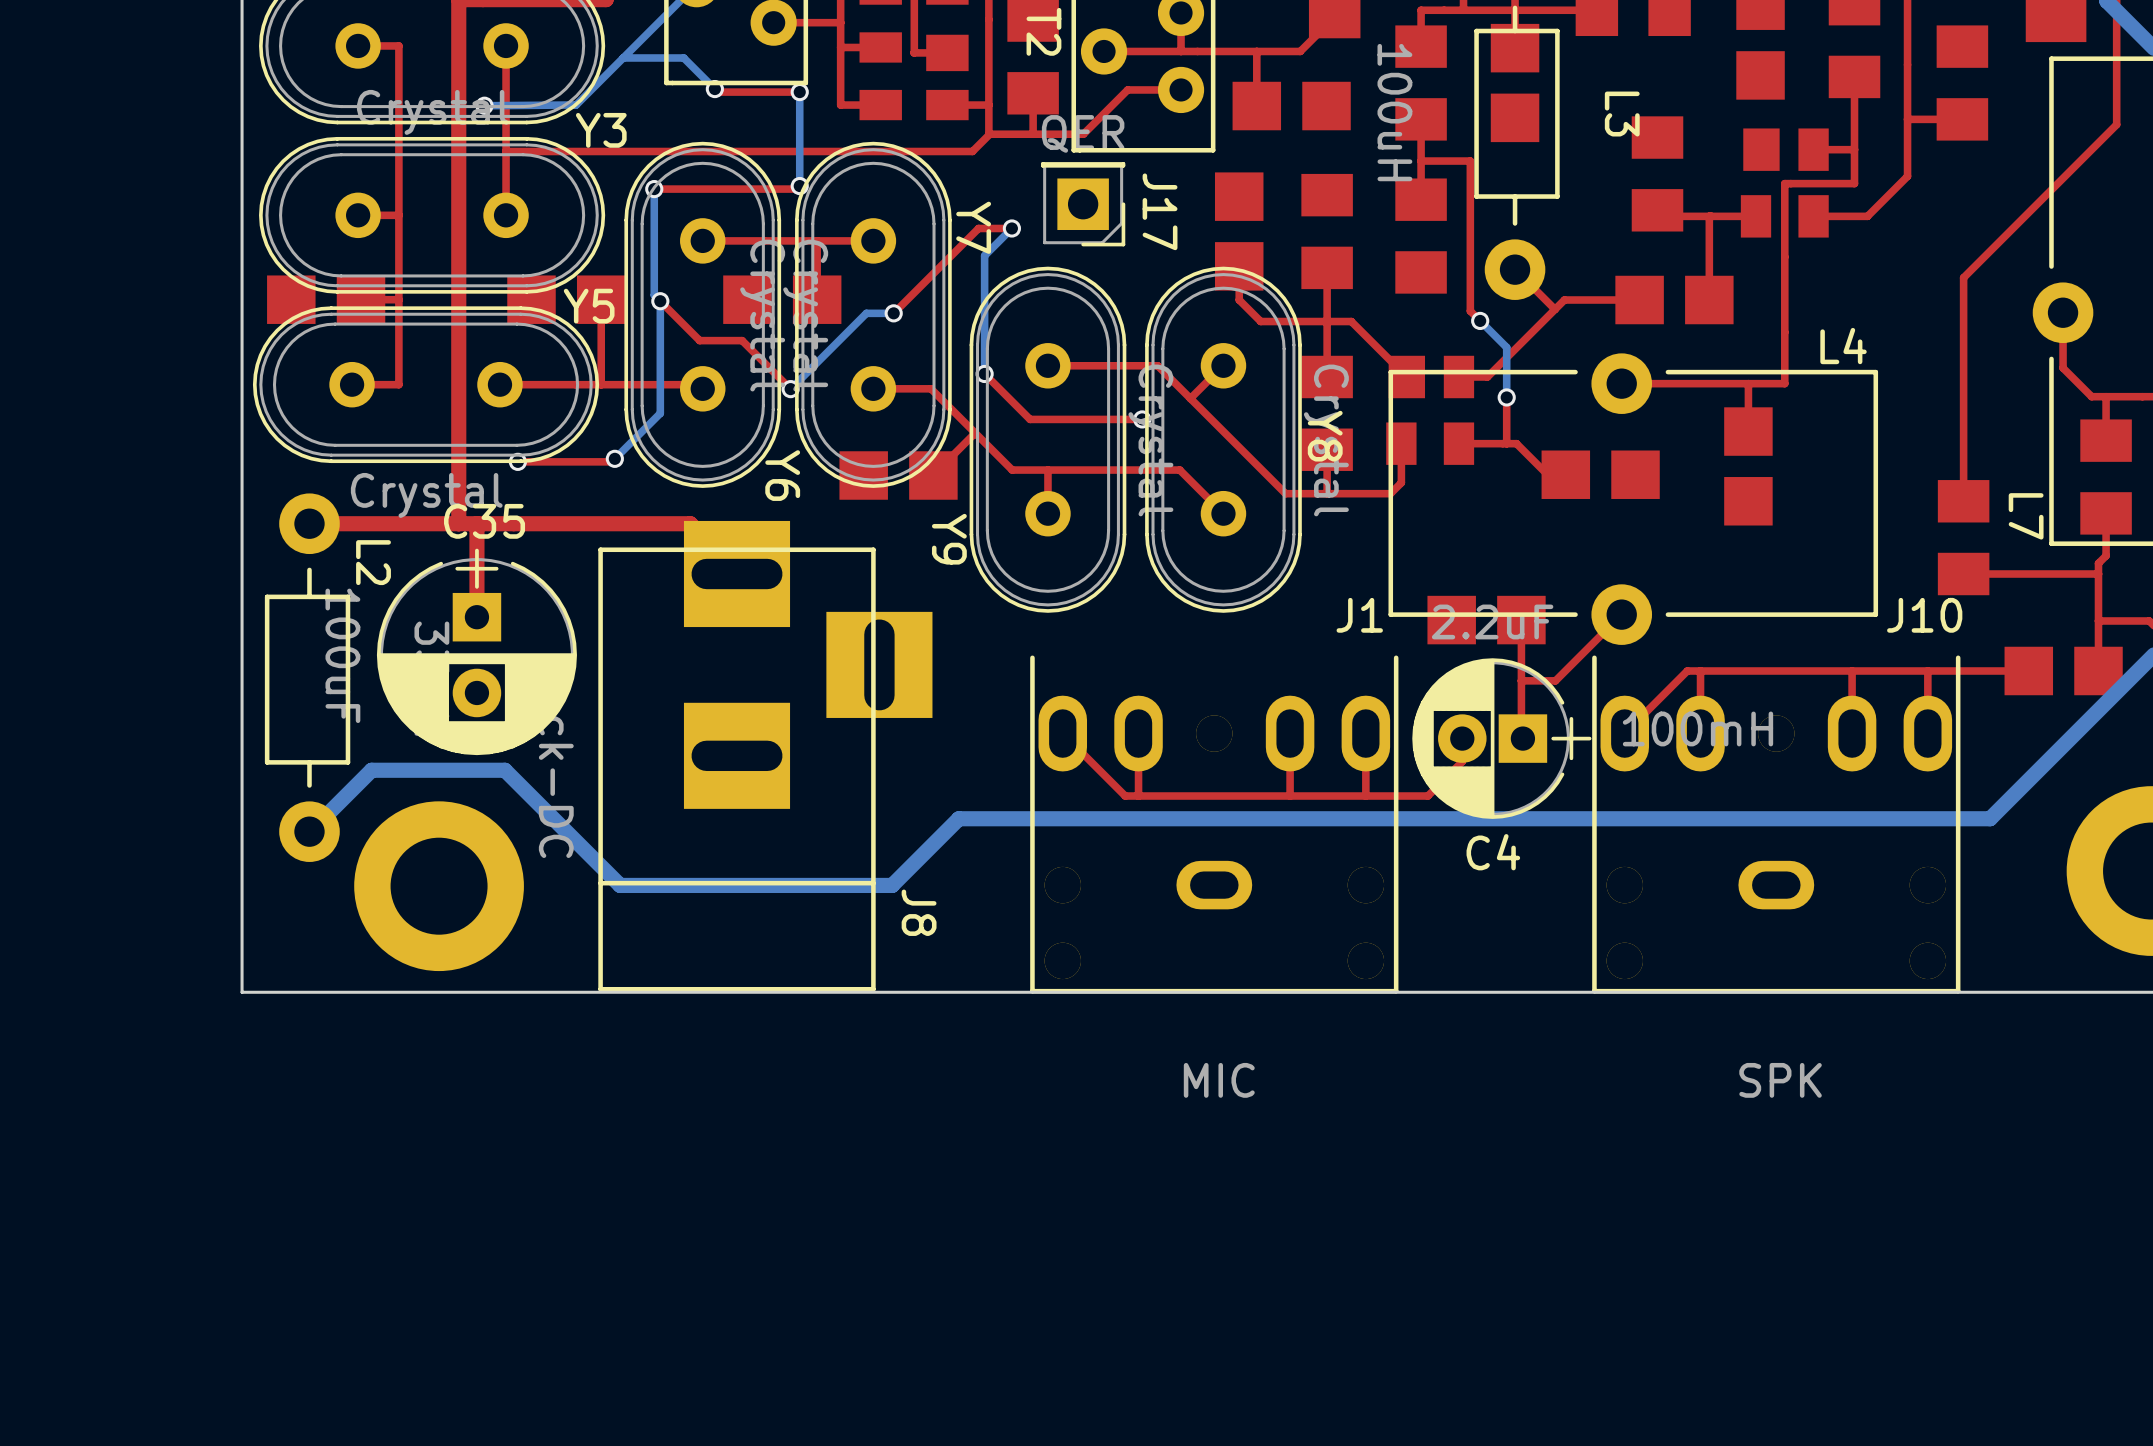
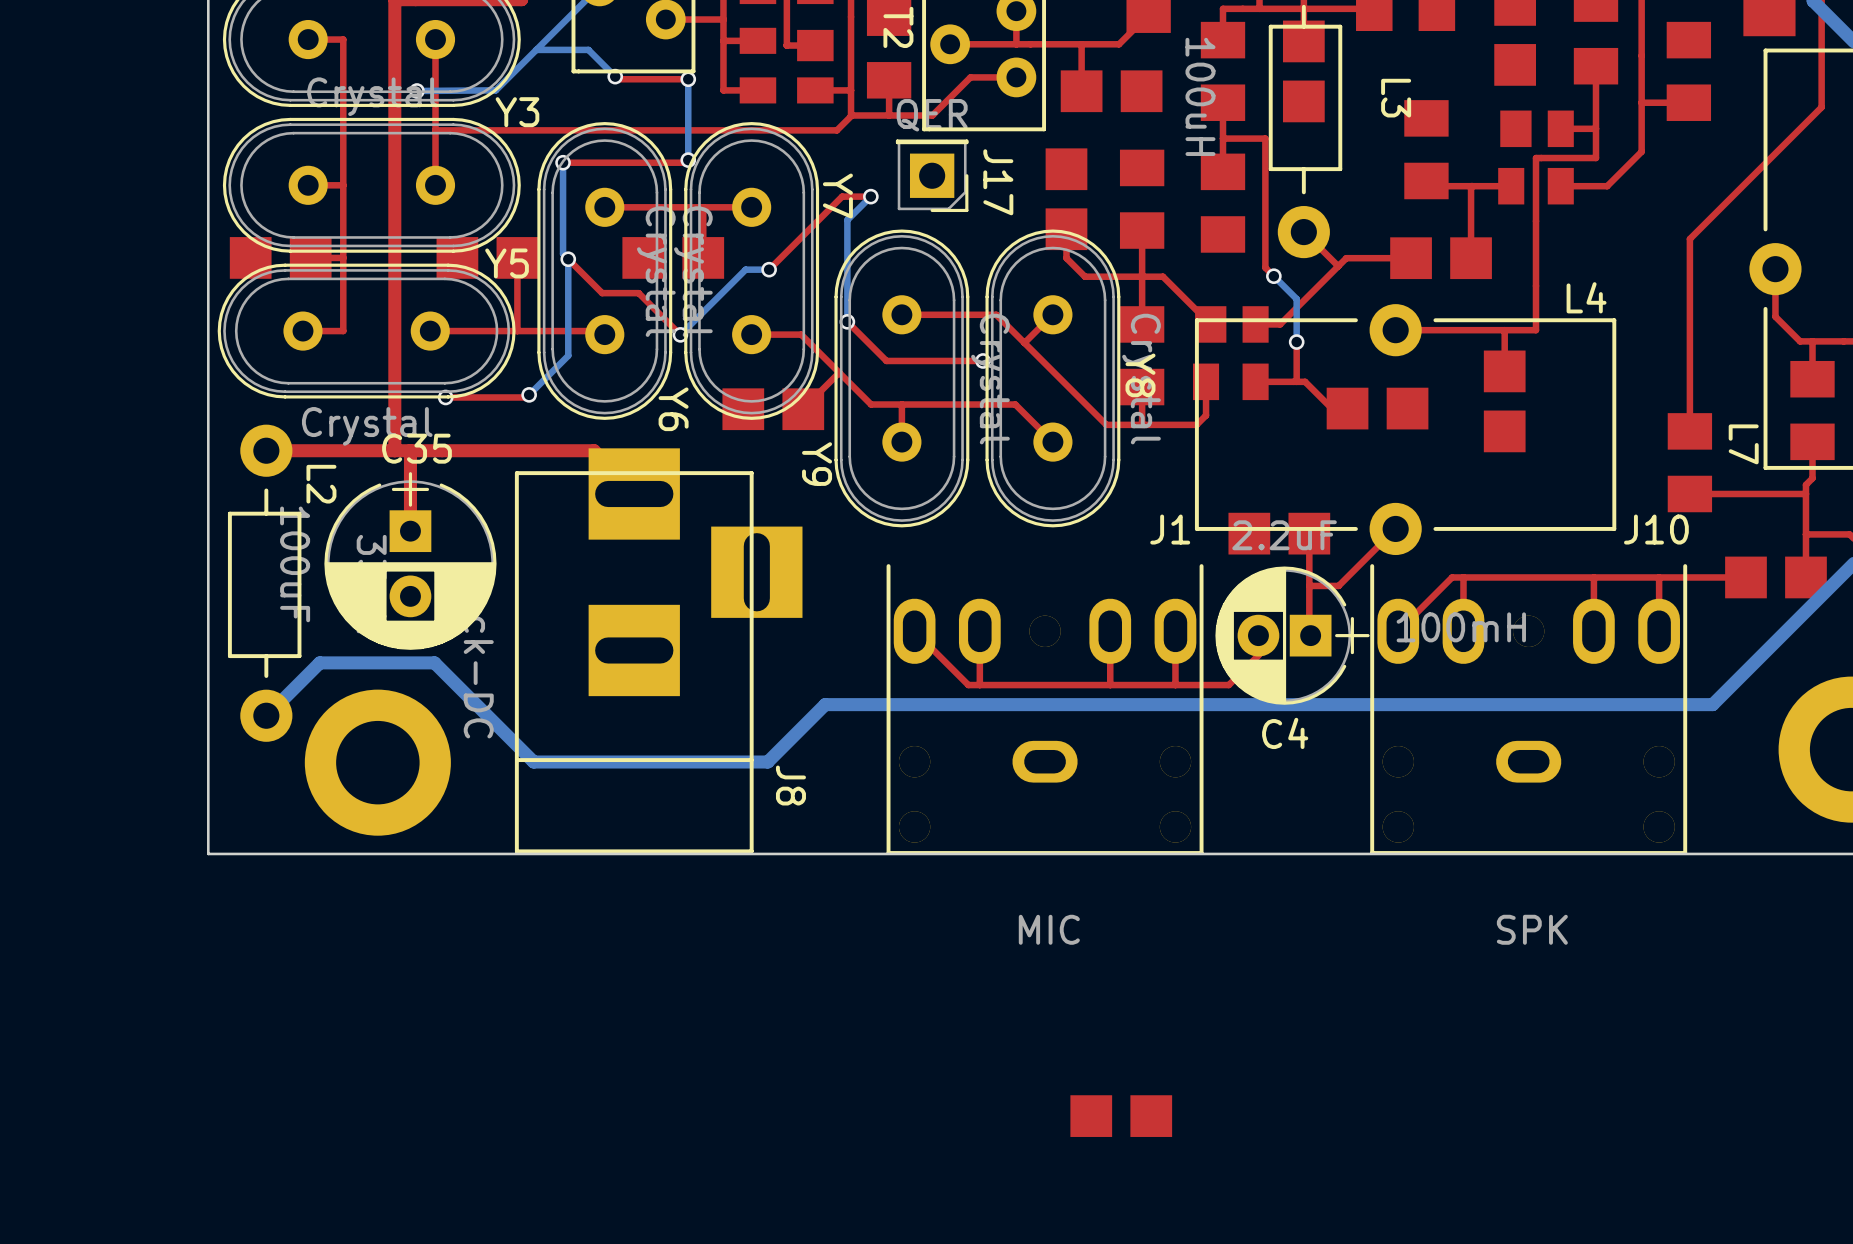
part: none -> (1121, 1116)

